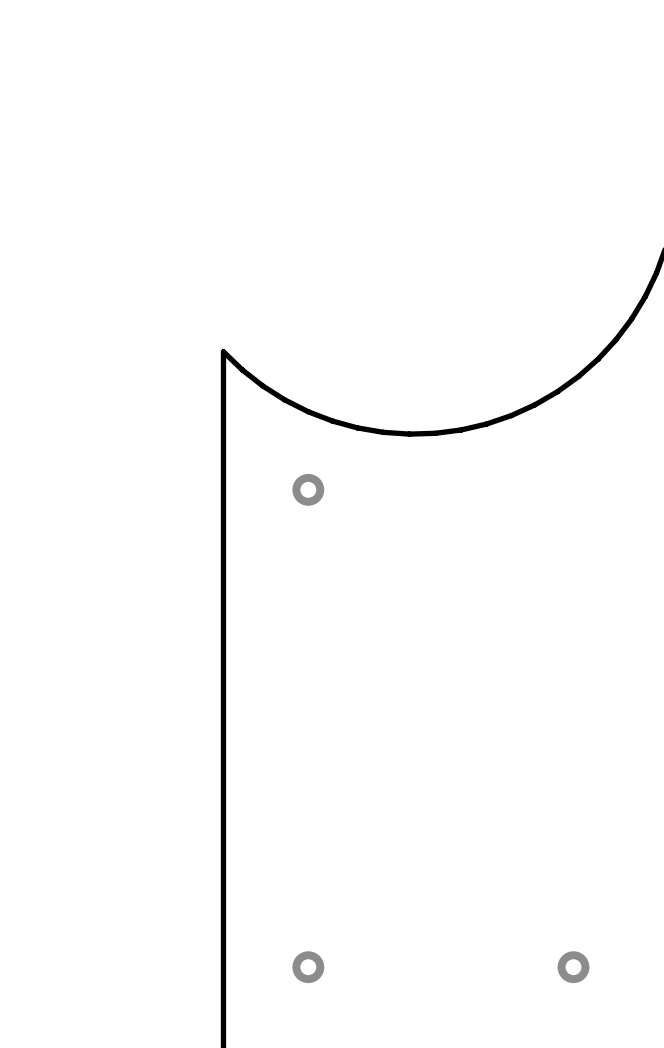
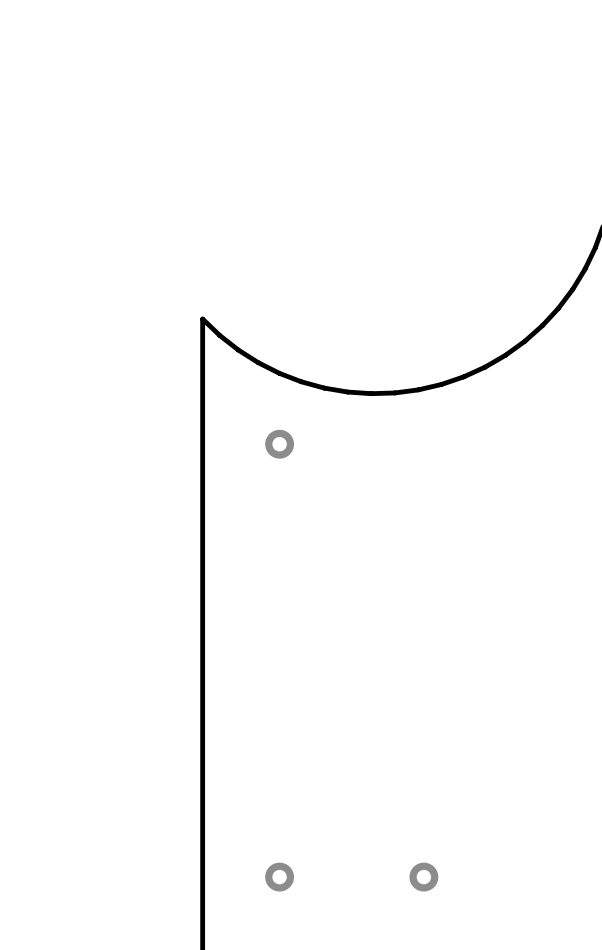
via position: (573, 967) -> (423, 877)

